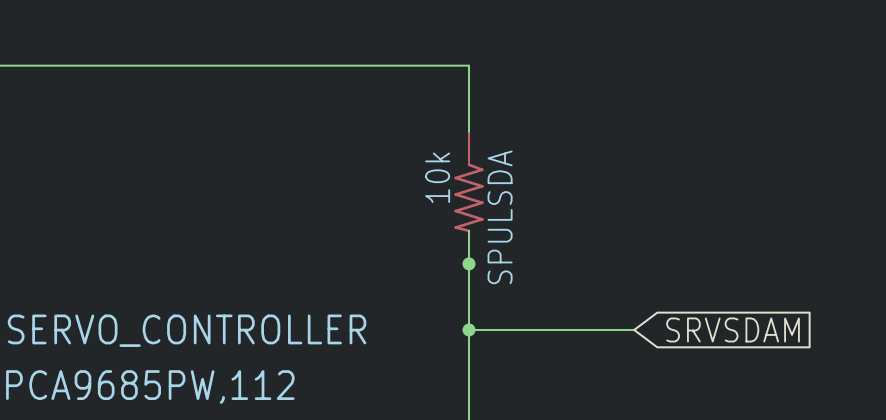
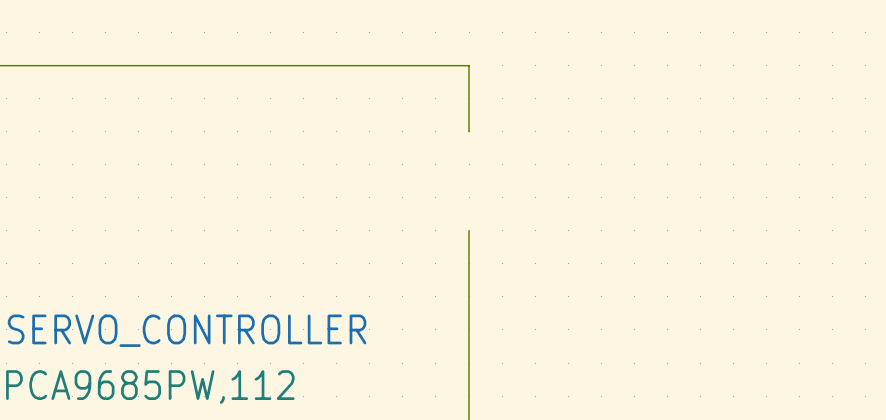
SPULSDA: 10k (469, 197) -> none
junction: (469, 263) -> none
wire: (469, 329) (634, 329) -> none
junction: (469, 329) -> none
global label: SRVSDAM (733, 329) -> none

